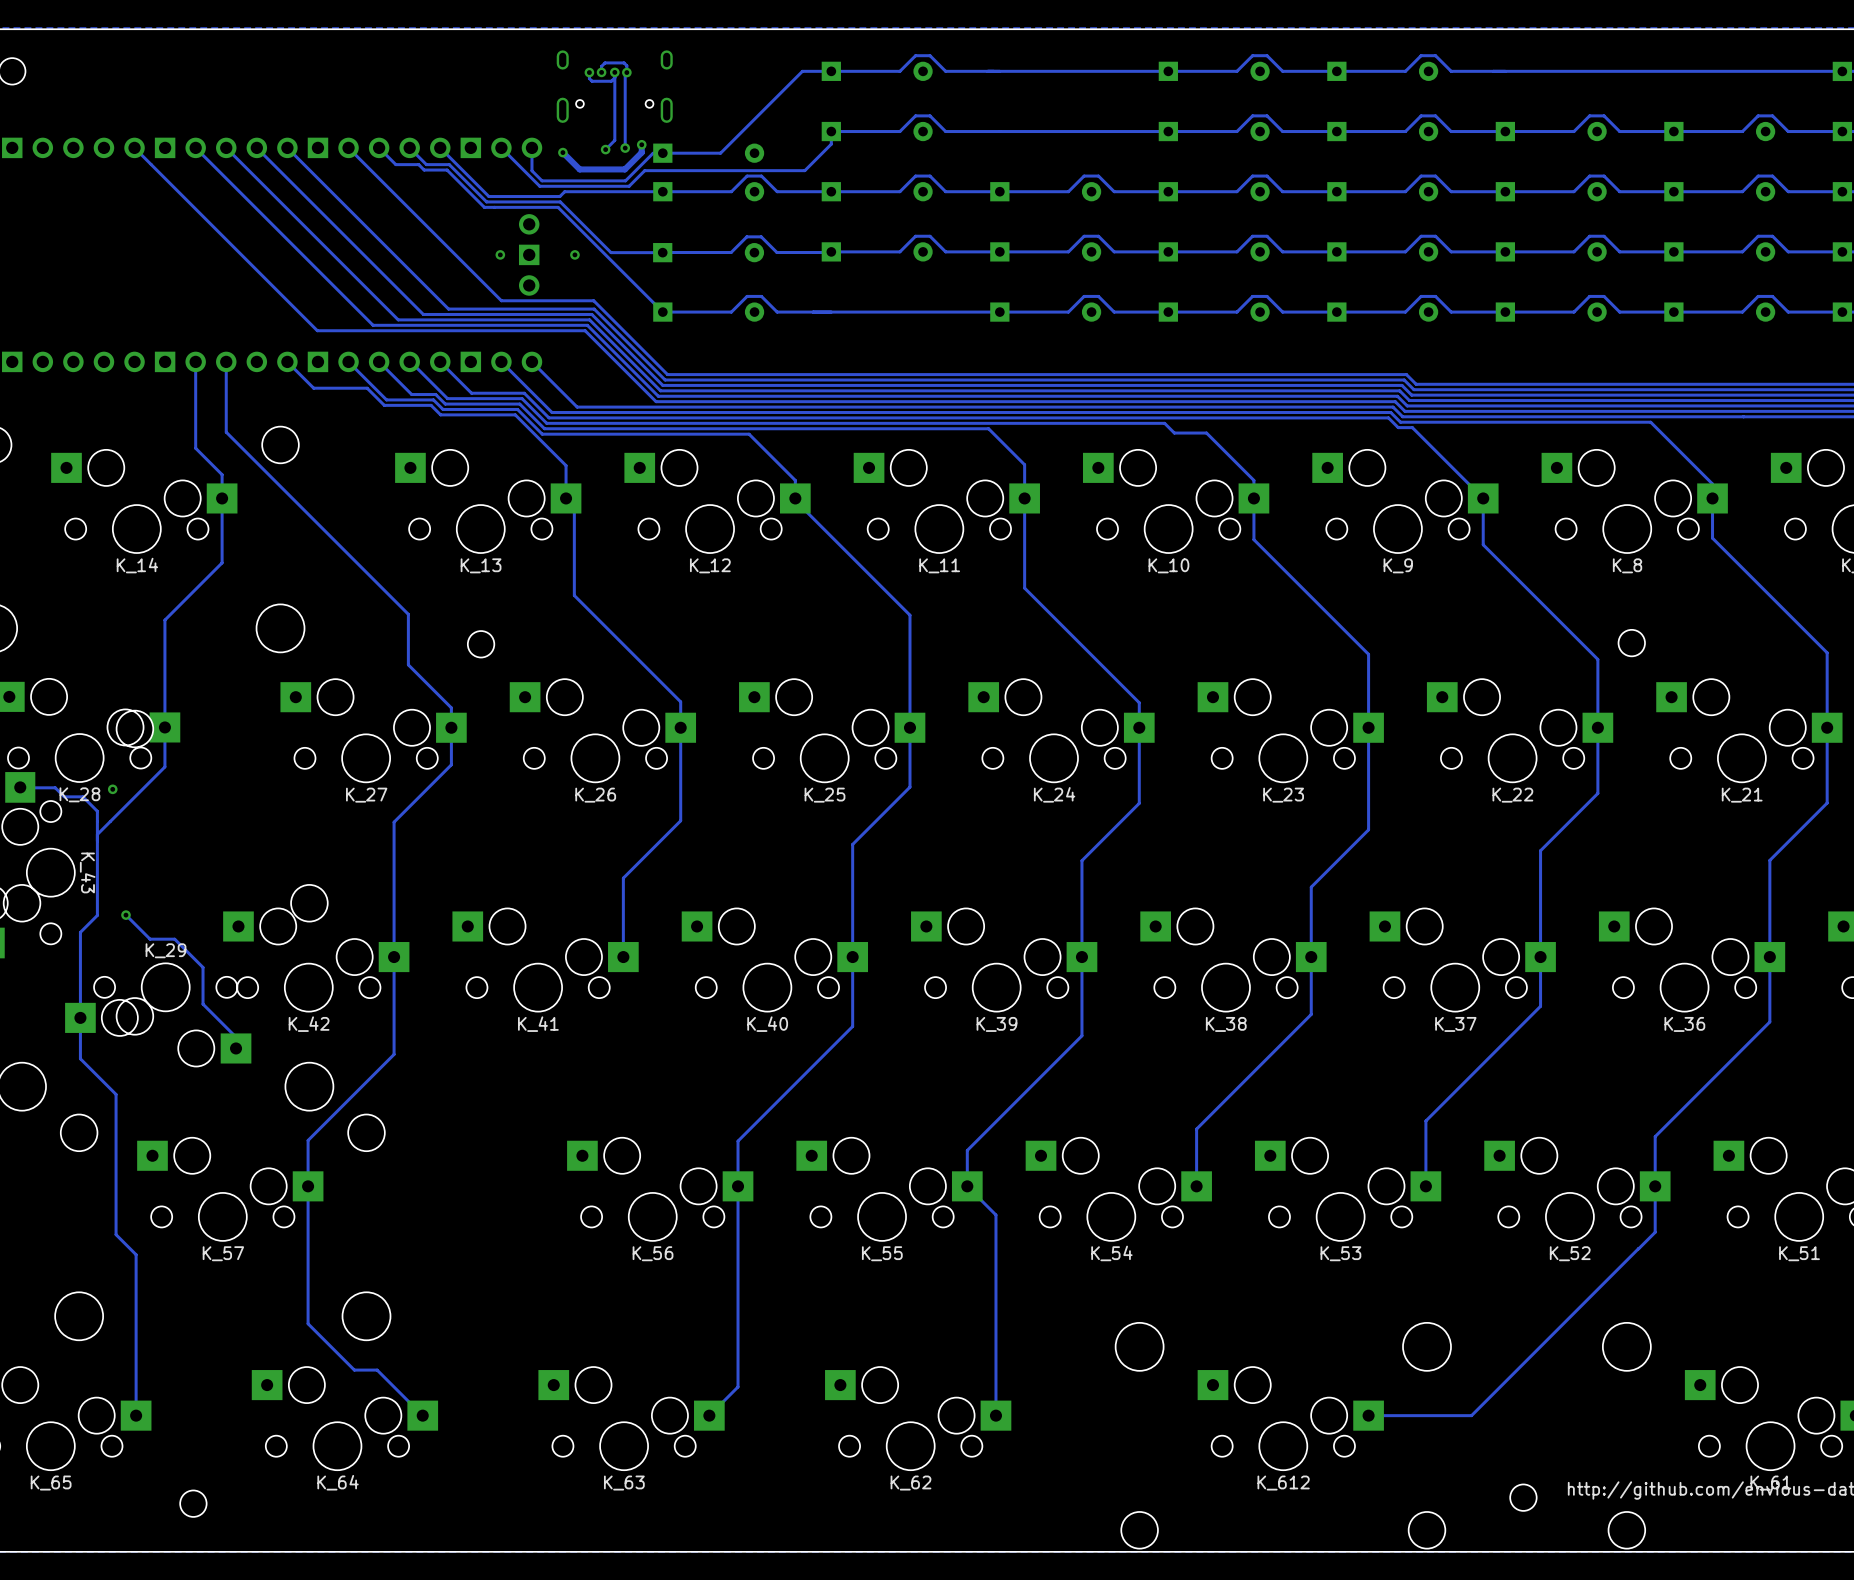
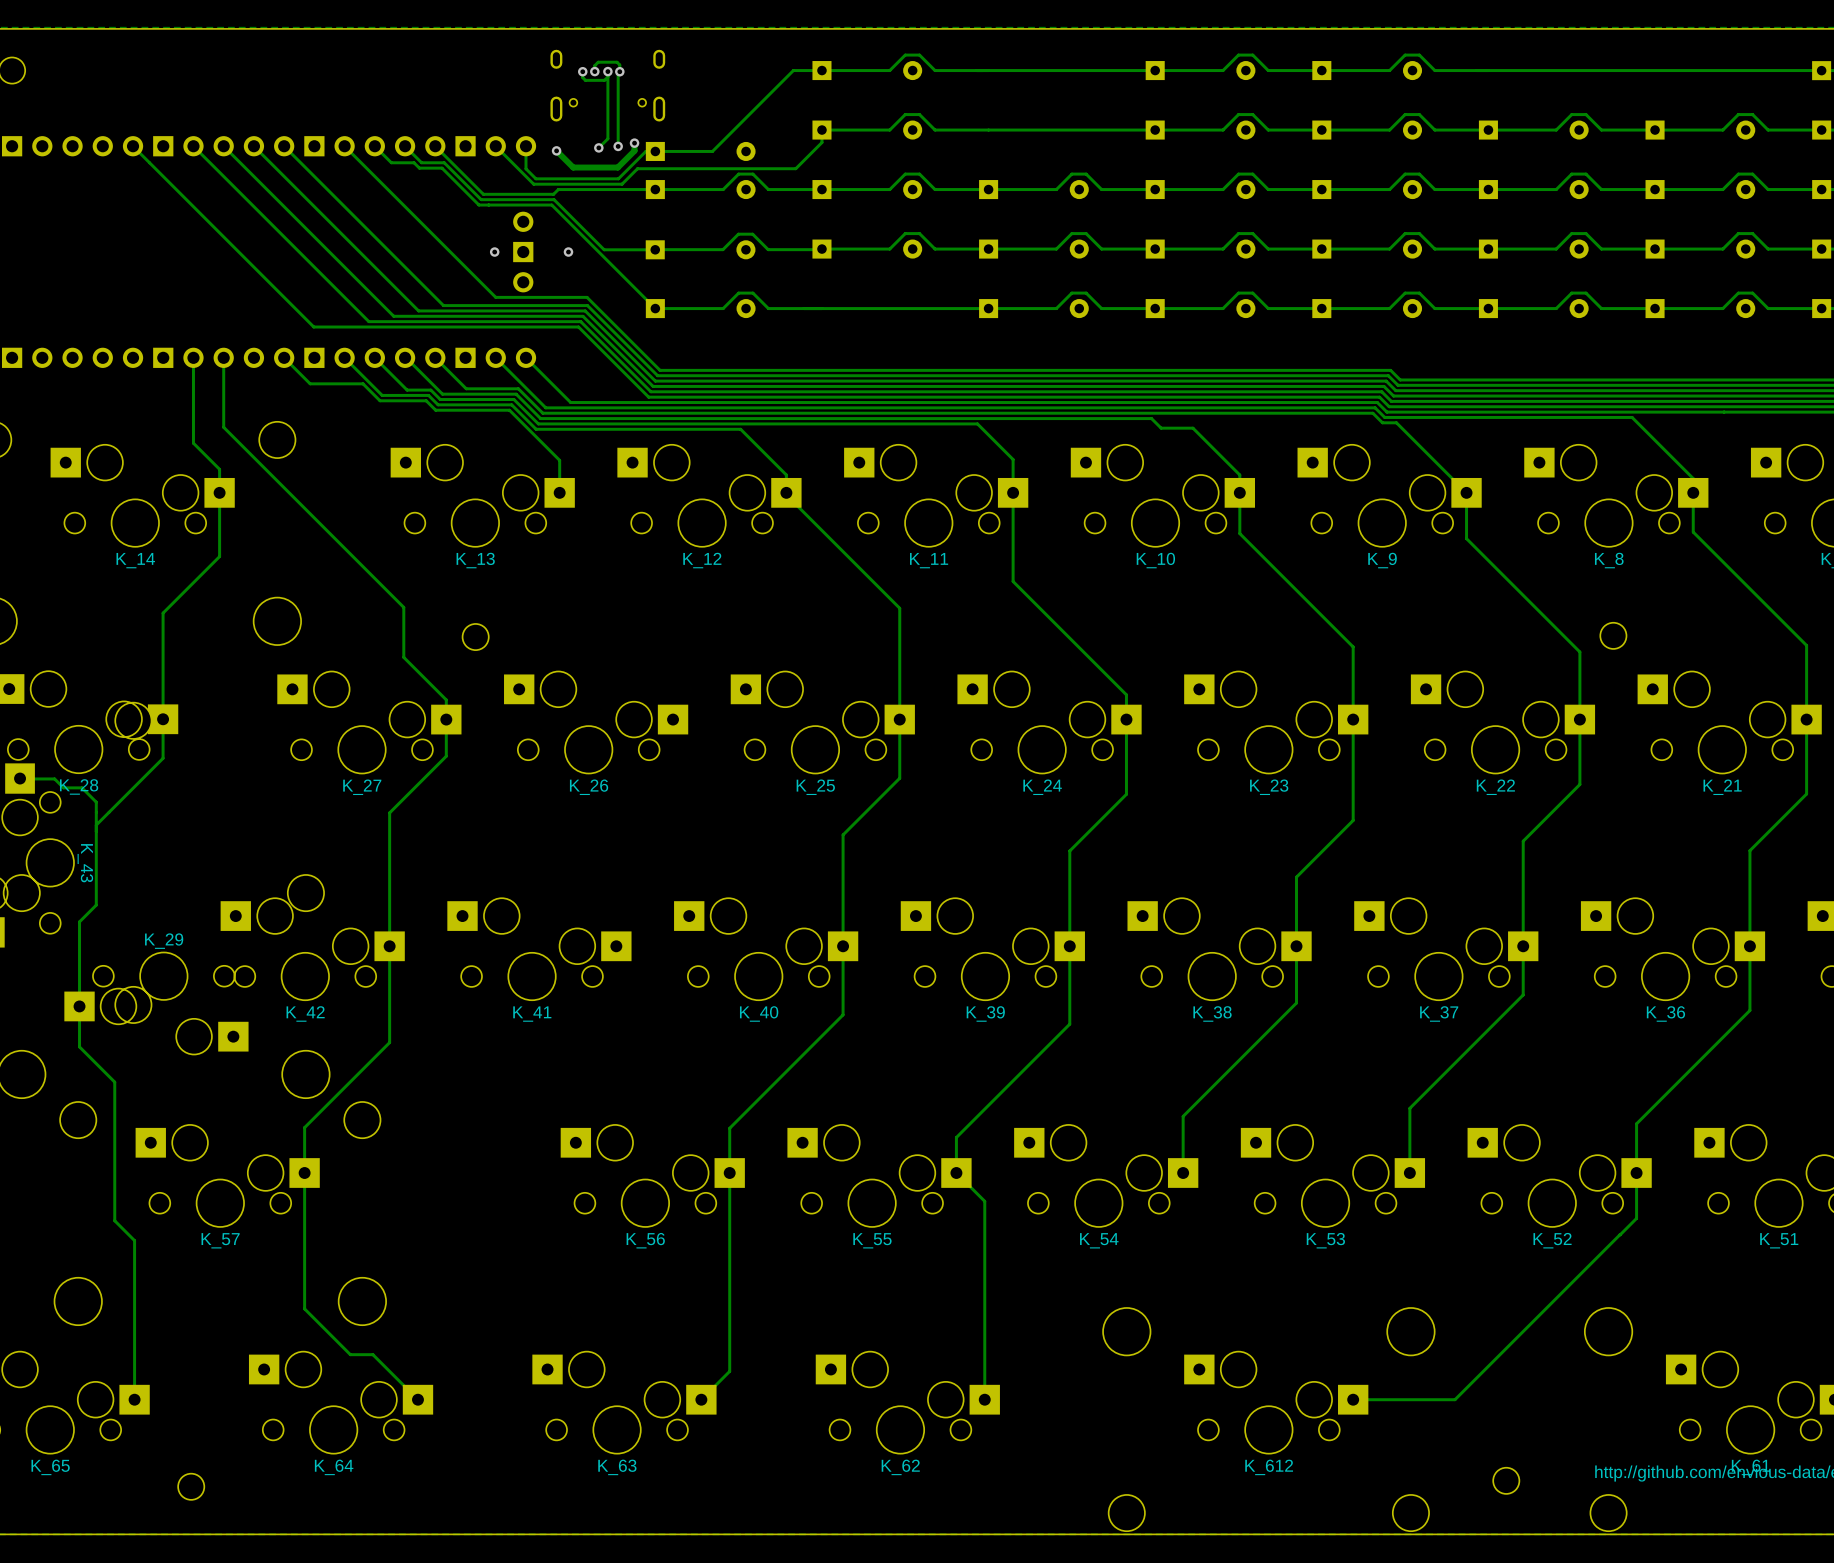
track: (566, 498) (574, 506) (574, 595) (680, 701) (680, 820) (623, 878) (623, 957) -> none
via: (112, 789) -> none
track: (125, 915) (150, 939) (174, 939) (203, 967) (203, 1004) (236, 1037) (236, 1048) -> none
via: (125, 915) -> none

